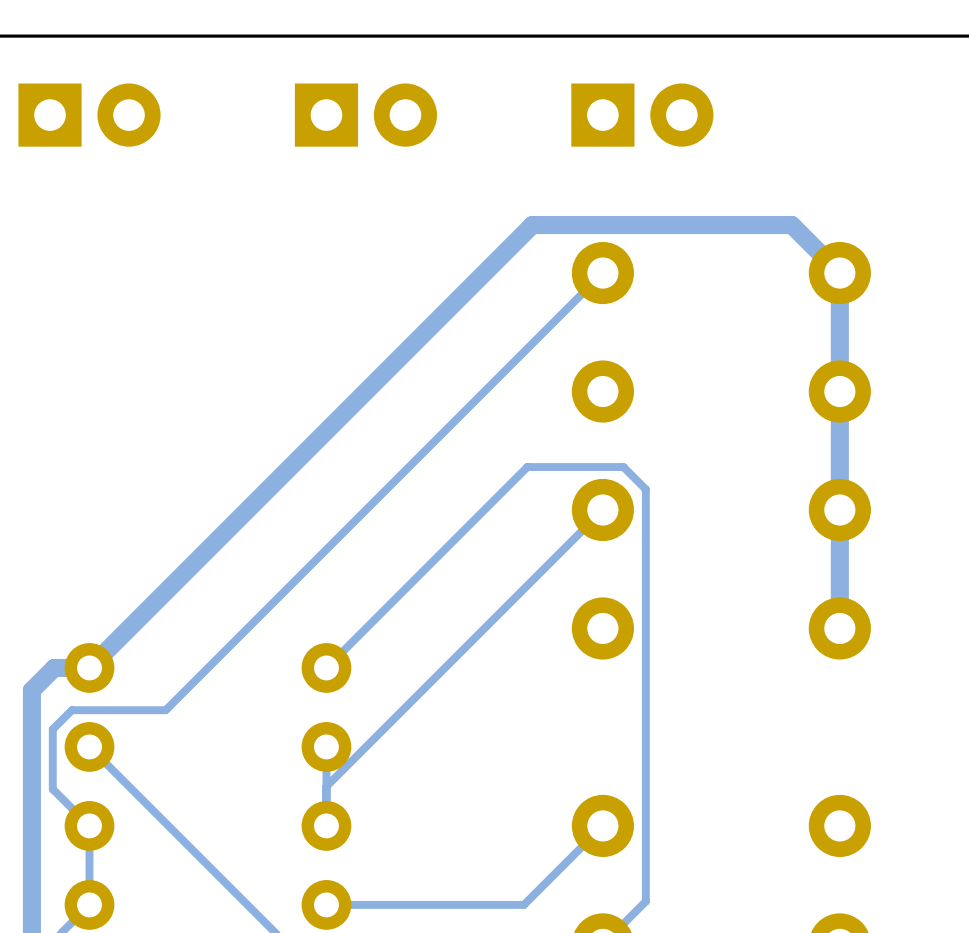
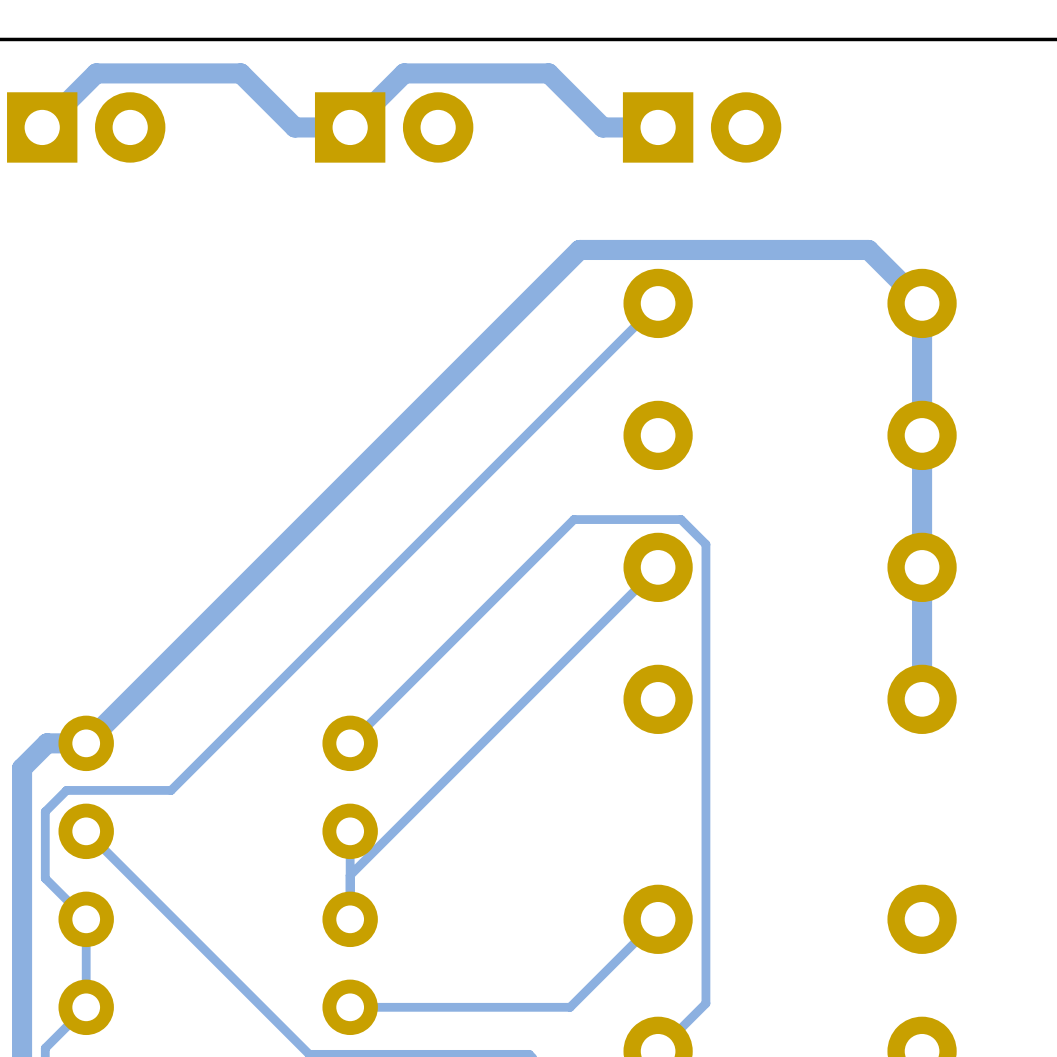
track: none -> (658, 127) (602, 127) (548, 73) (404, 73) (350, 127) (294, 127) (240, 73) (96, 73) (42, 127)

